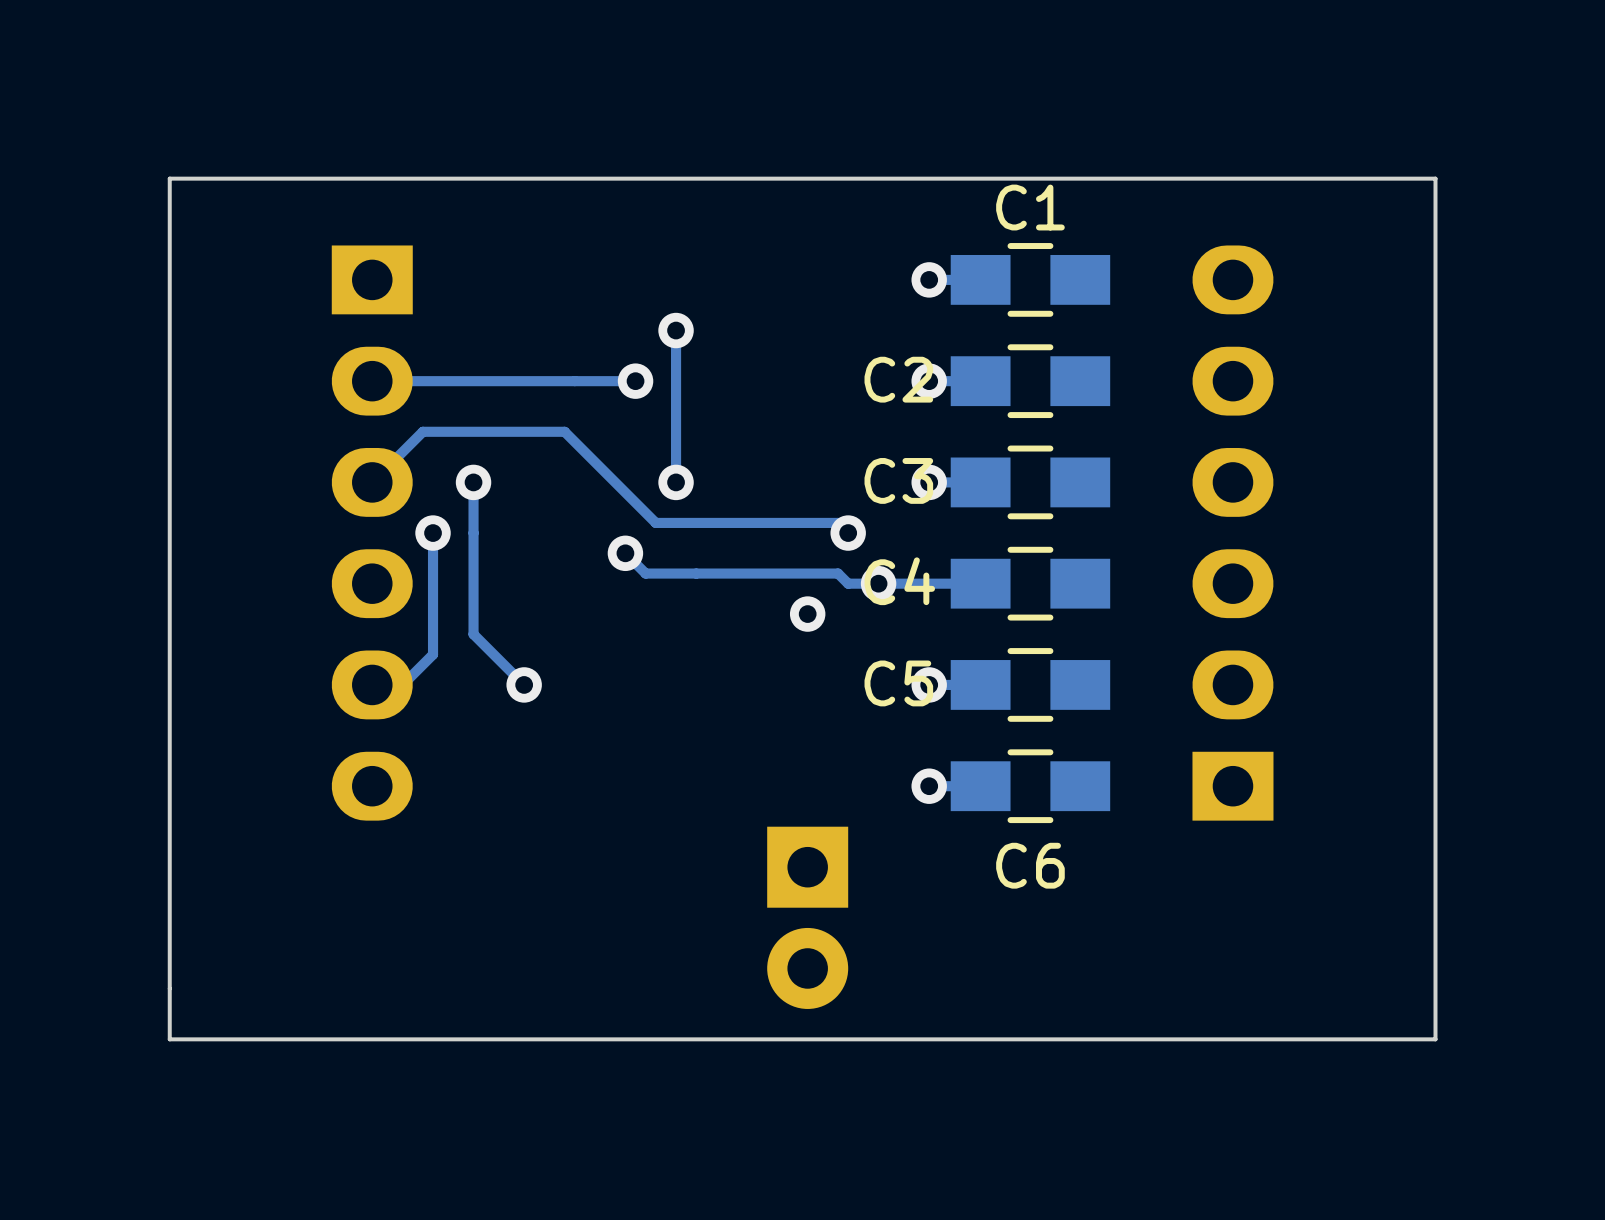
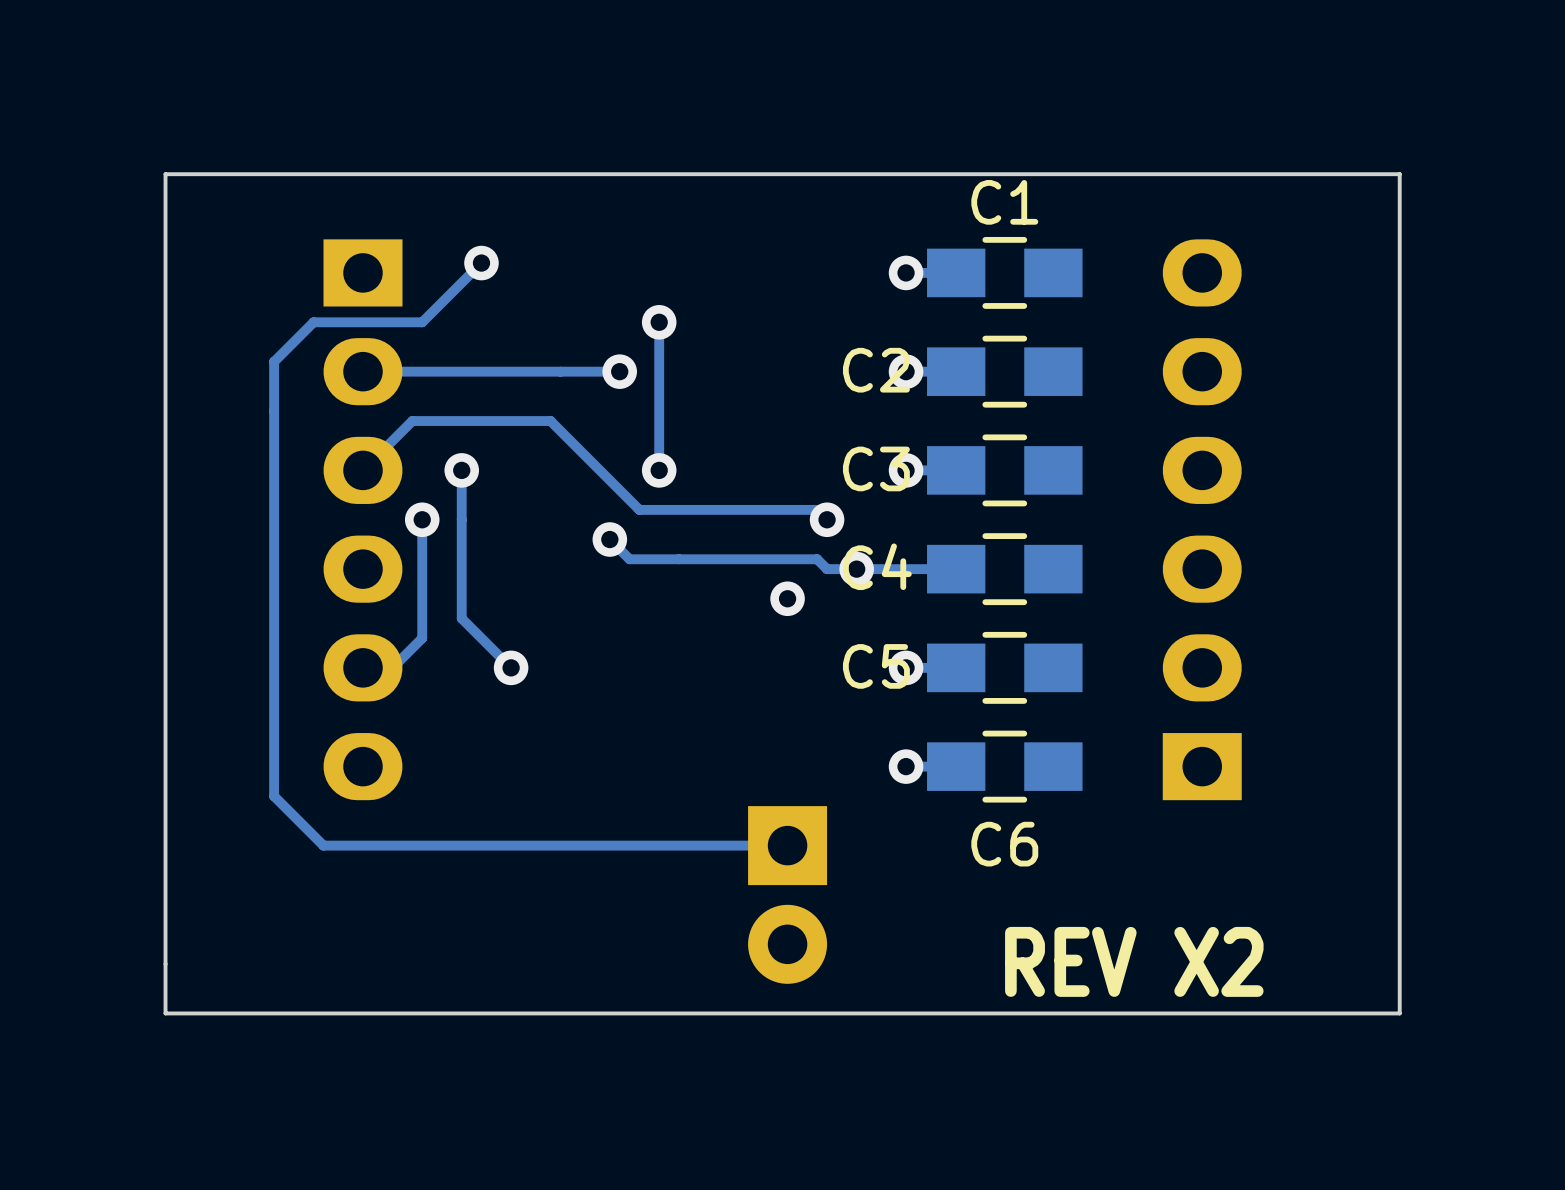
track: none -> (481, 263) (422, 322) (313, 322) (274, 361) (274, 796) (323, 845) (787, 845)
via: none -> (481, 263)
text: none -> REV X2 (1134, 961)

